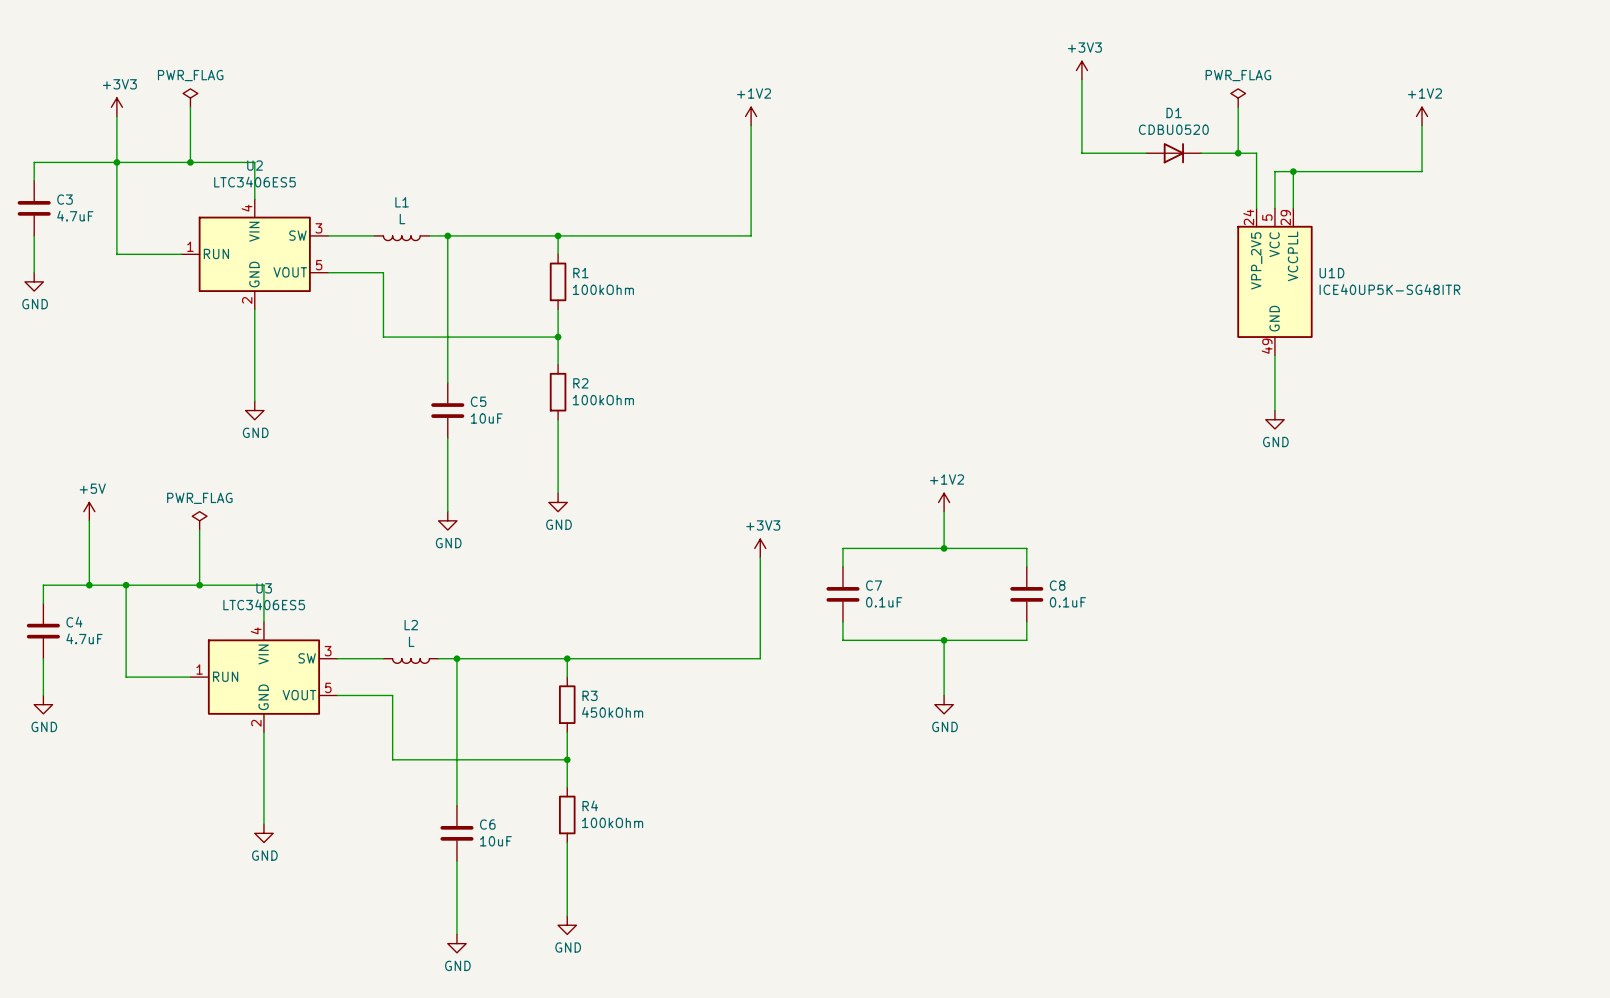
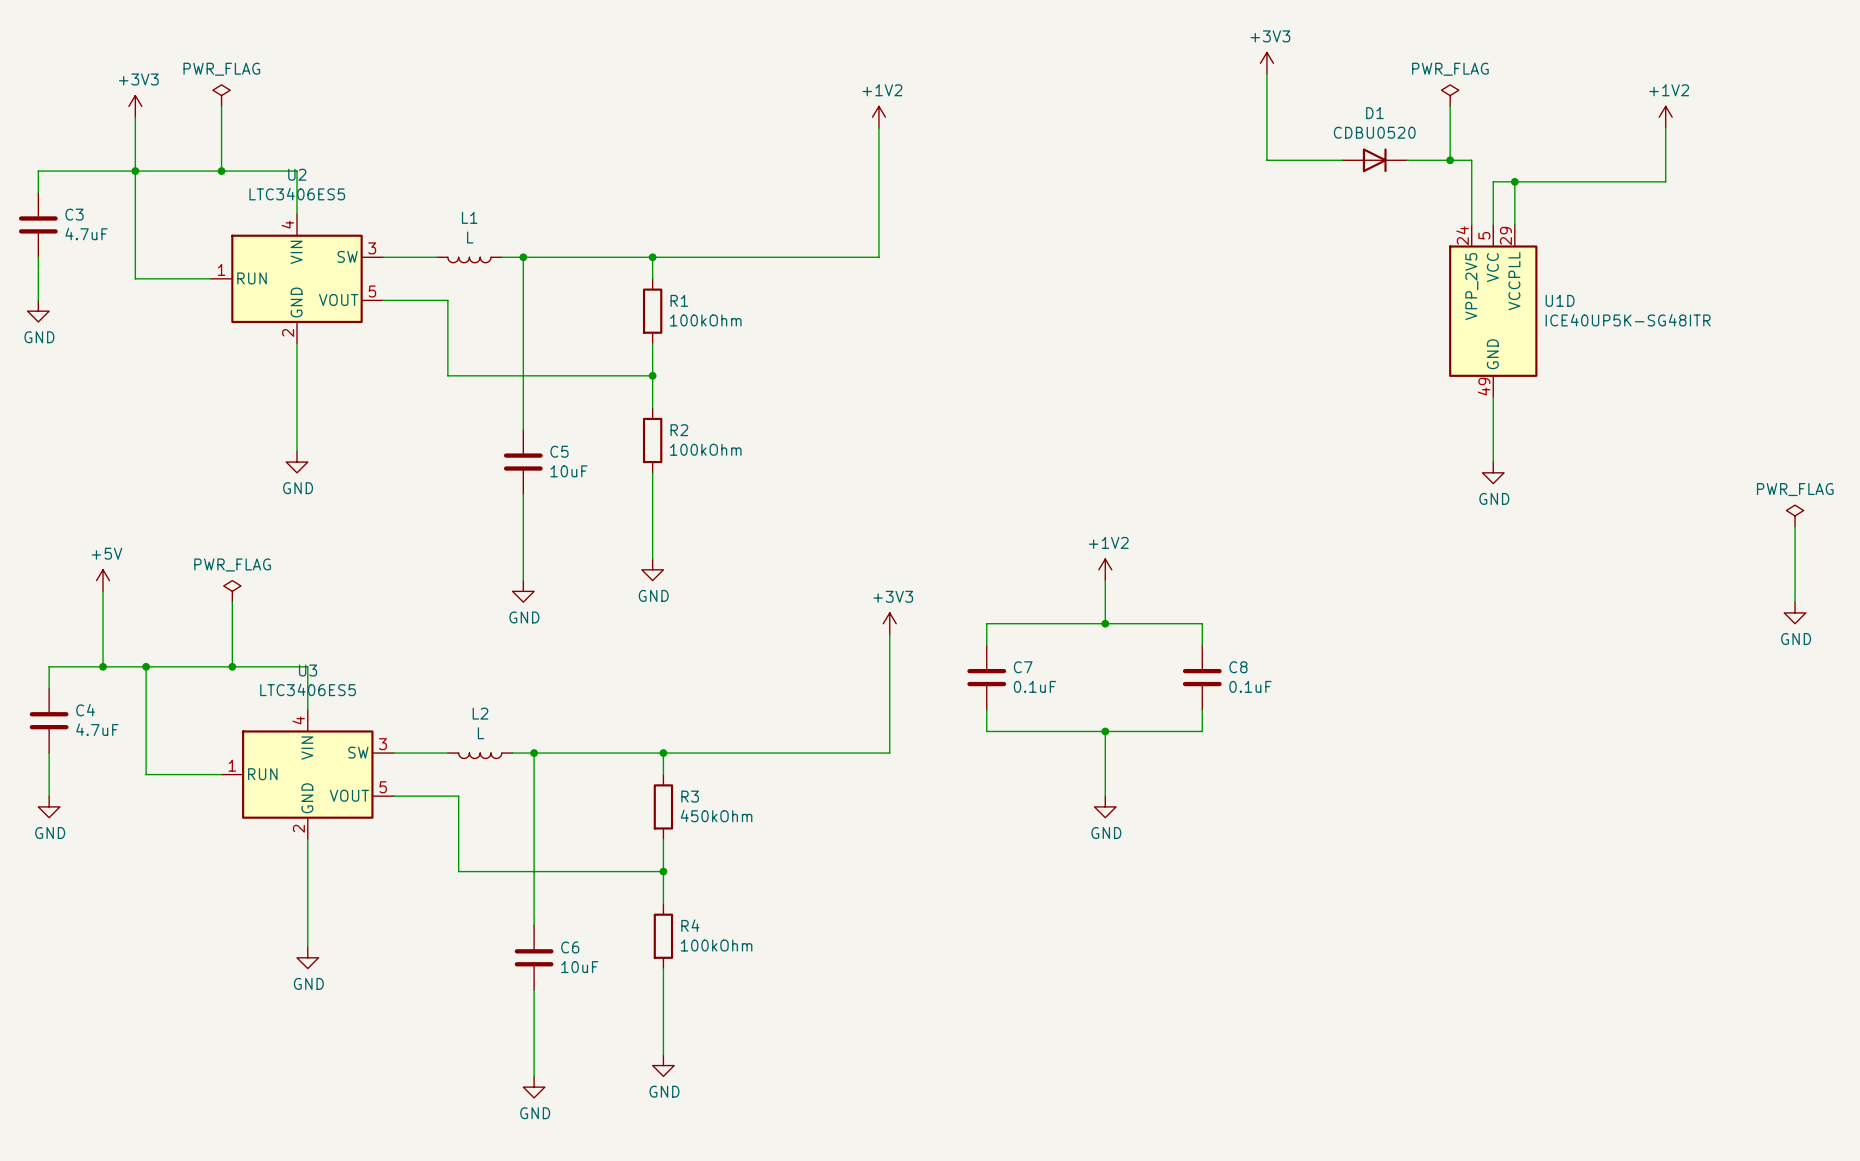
power symbol: none -> PWR_FLAG (1795, 515)
wire: none -> (1795, 526) (1795, 602)
power symbol: none -> GND (1795, 612)

